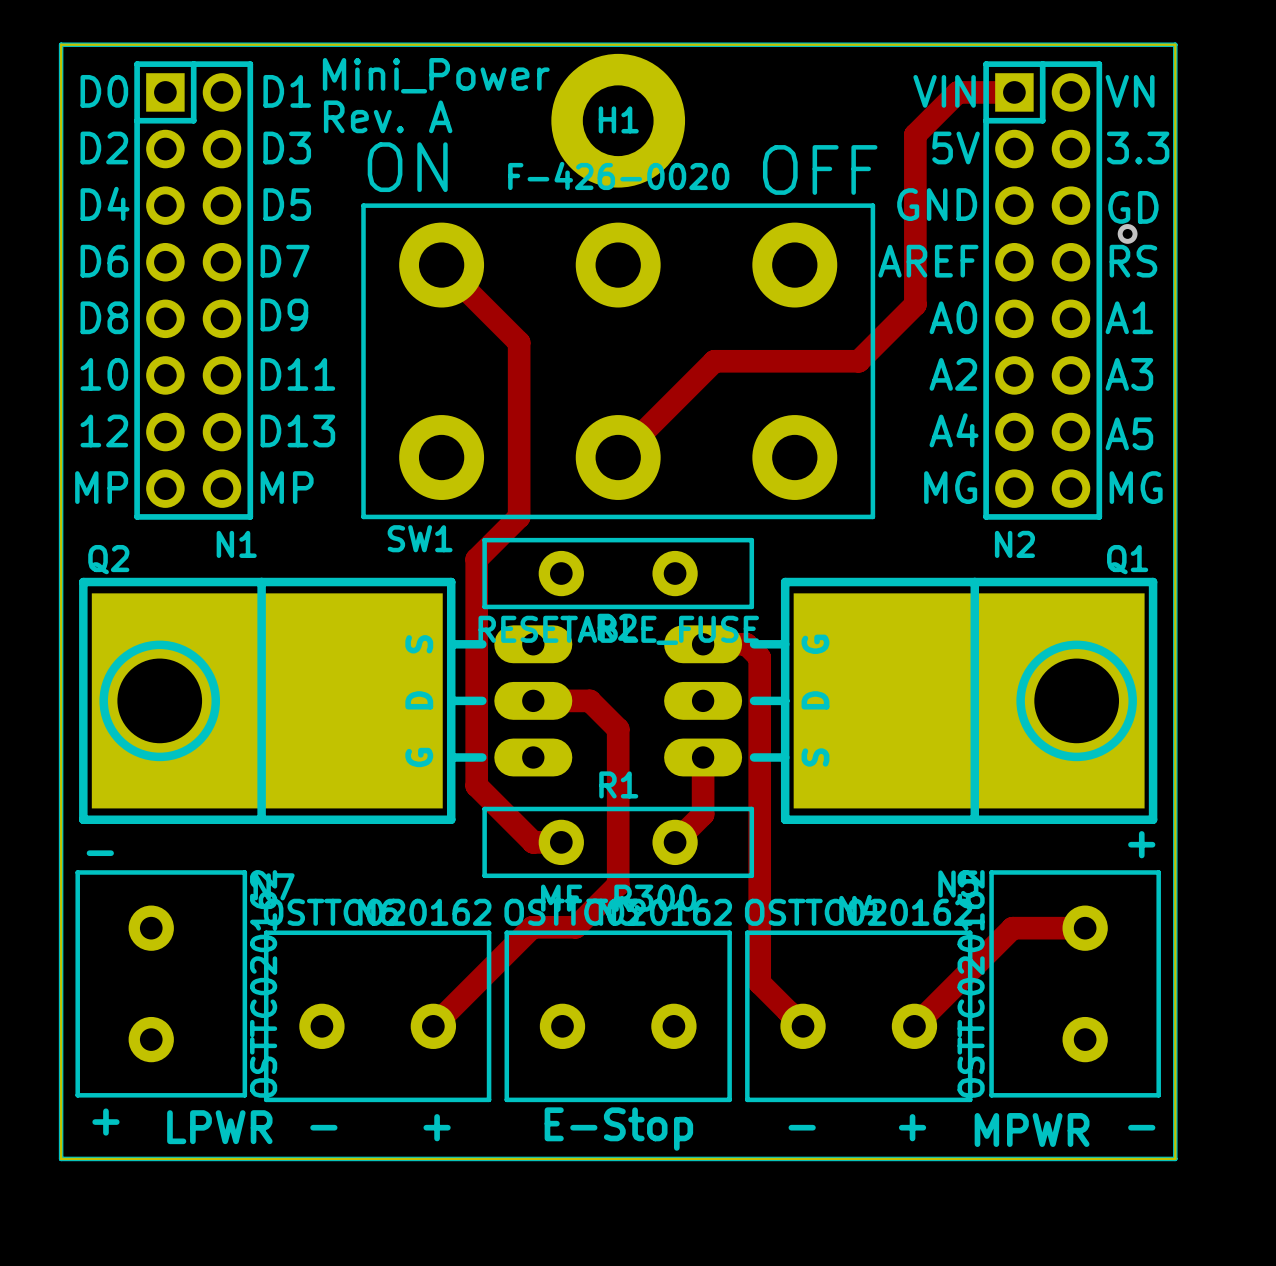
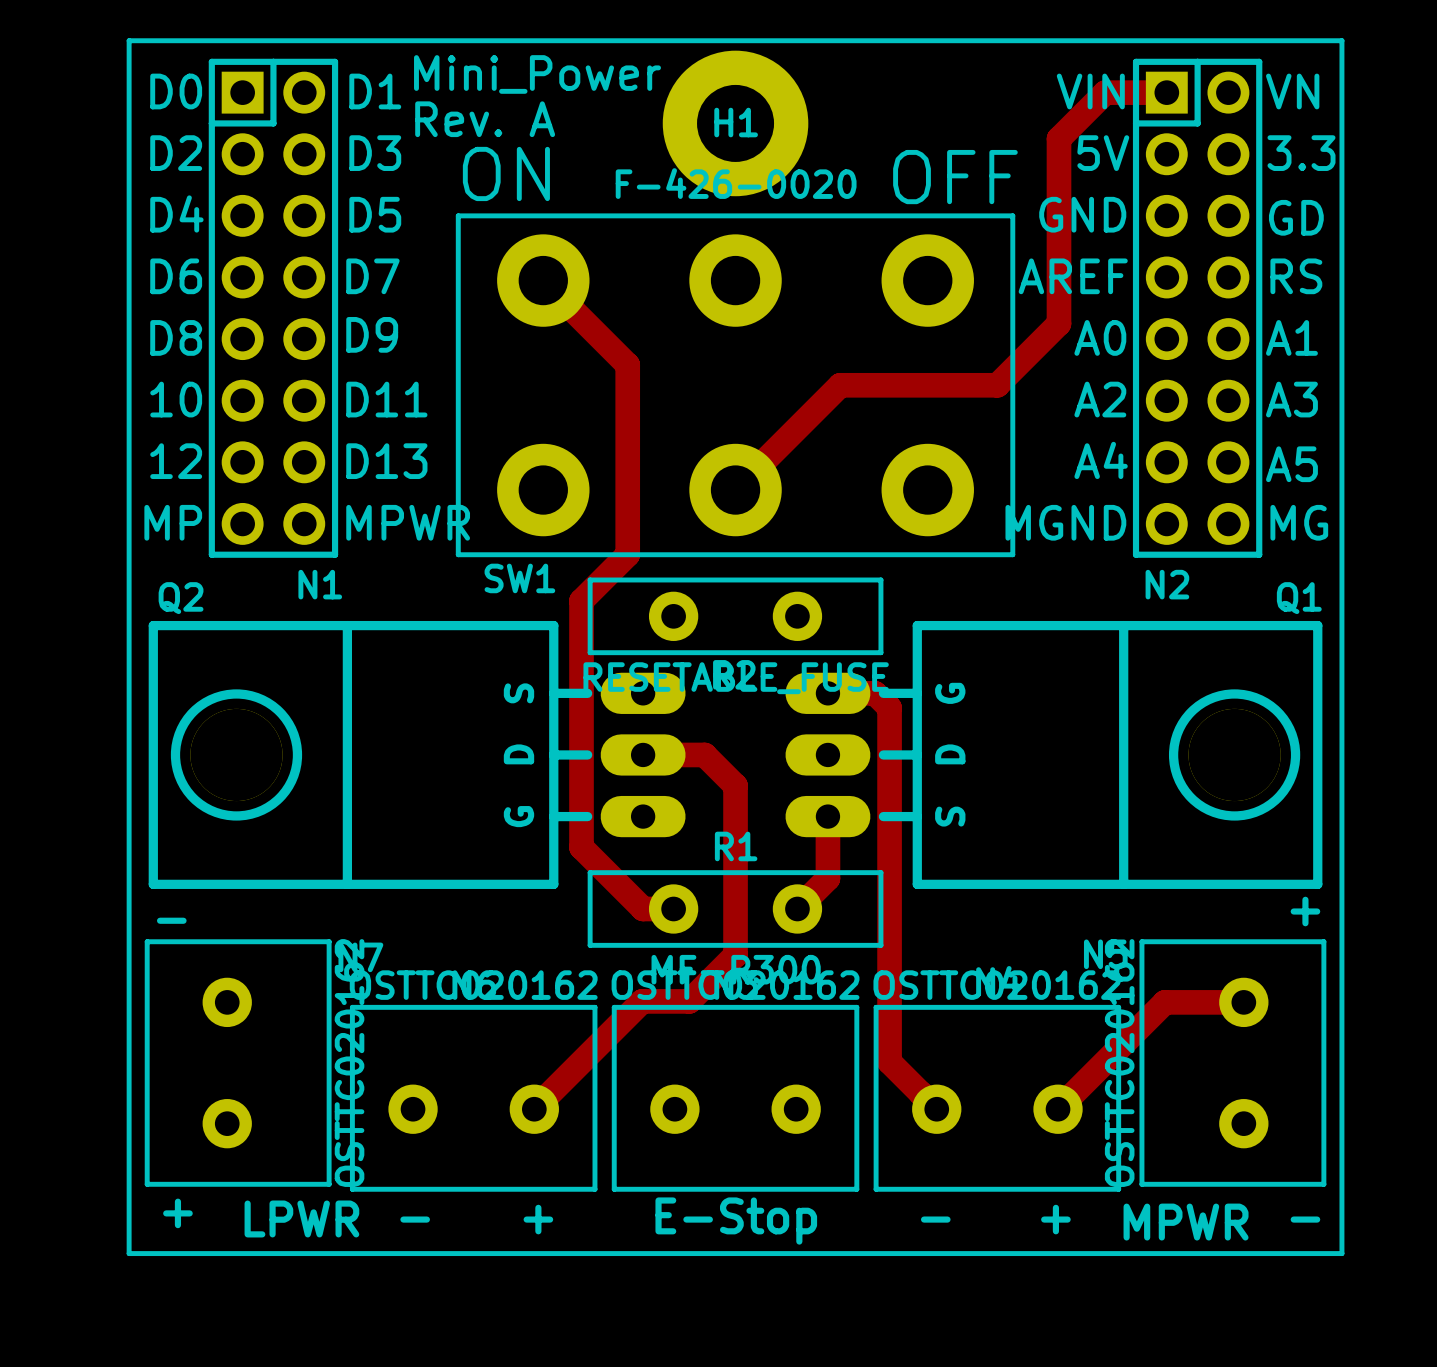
board edge: (61, 44) (61, 1158) (1175, 1158) (1175, 44) (61, 44) -> none
via: (1127, 233) -> none
text: MP (287, 487) -> MPWR (408, 522)
text: MG (950, 487) -> MGND (1065, 522)
Q2 footprint: [79, 577, 573, 824] -> [148, 620, 686, 889]
Q1 footprint: [664, 577, 1158, 824] -> [785, 620, 1323, 889]

